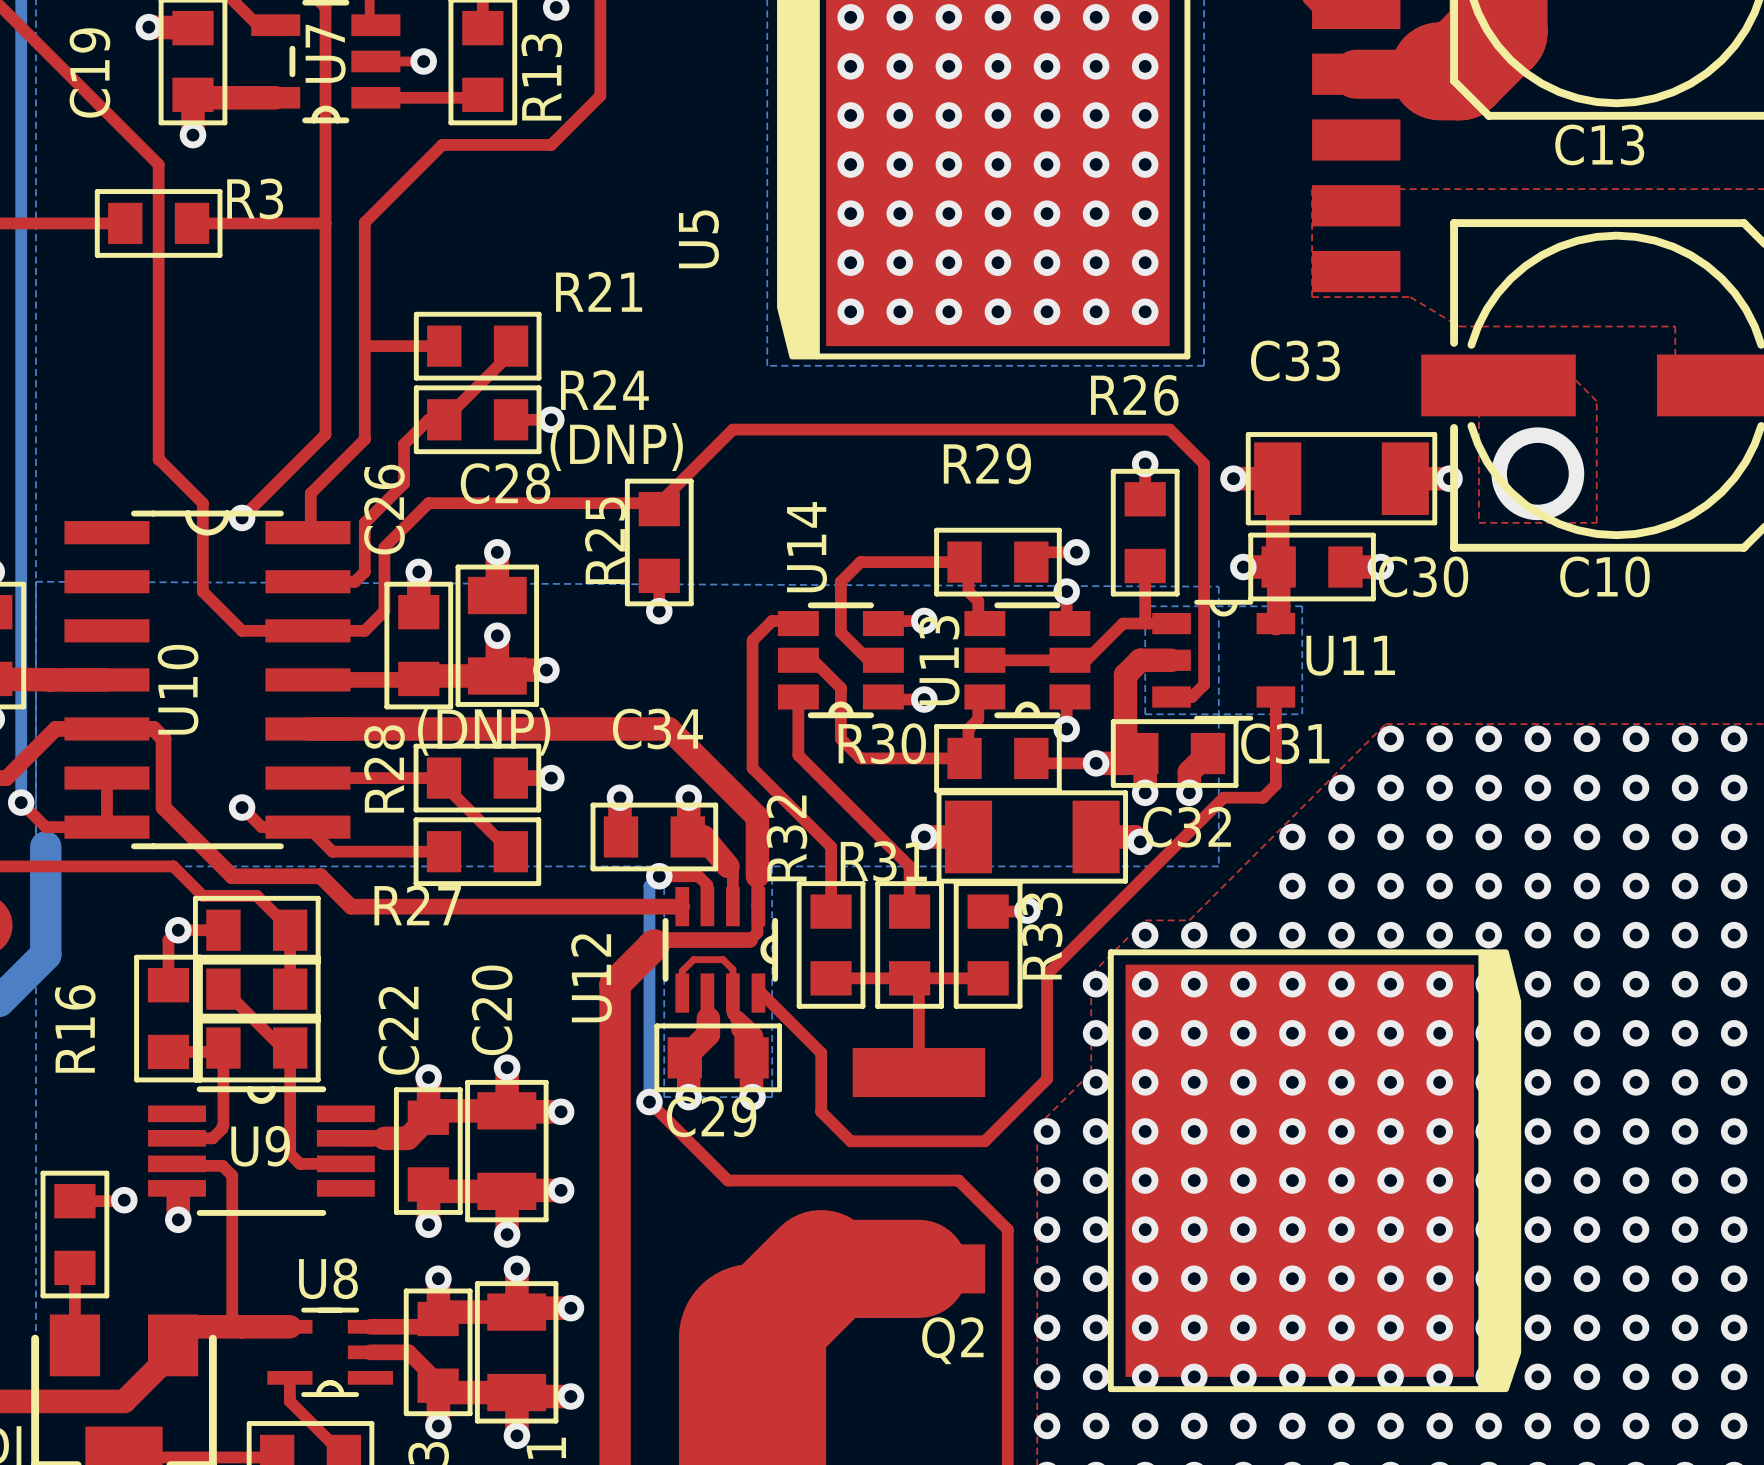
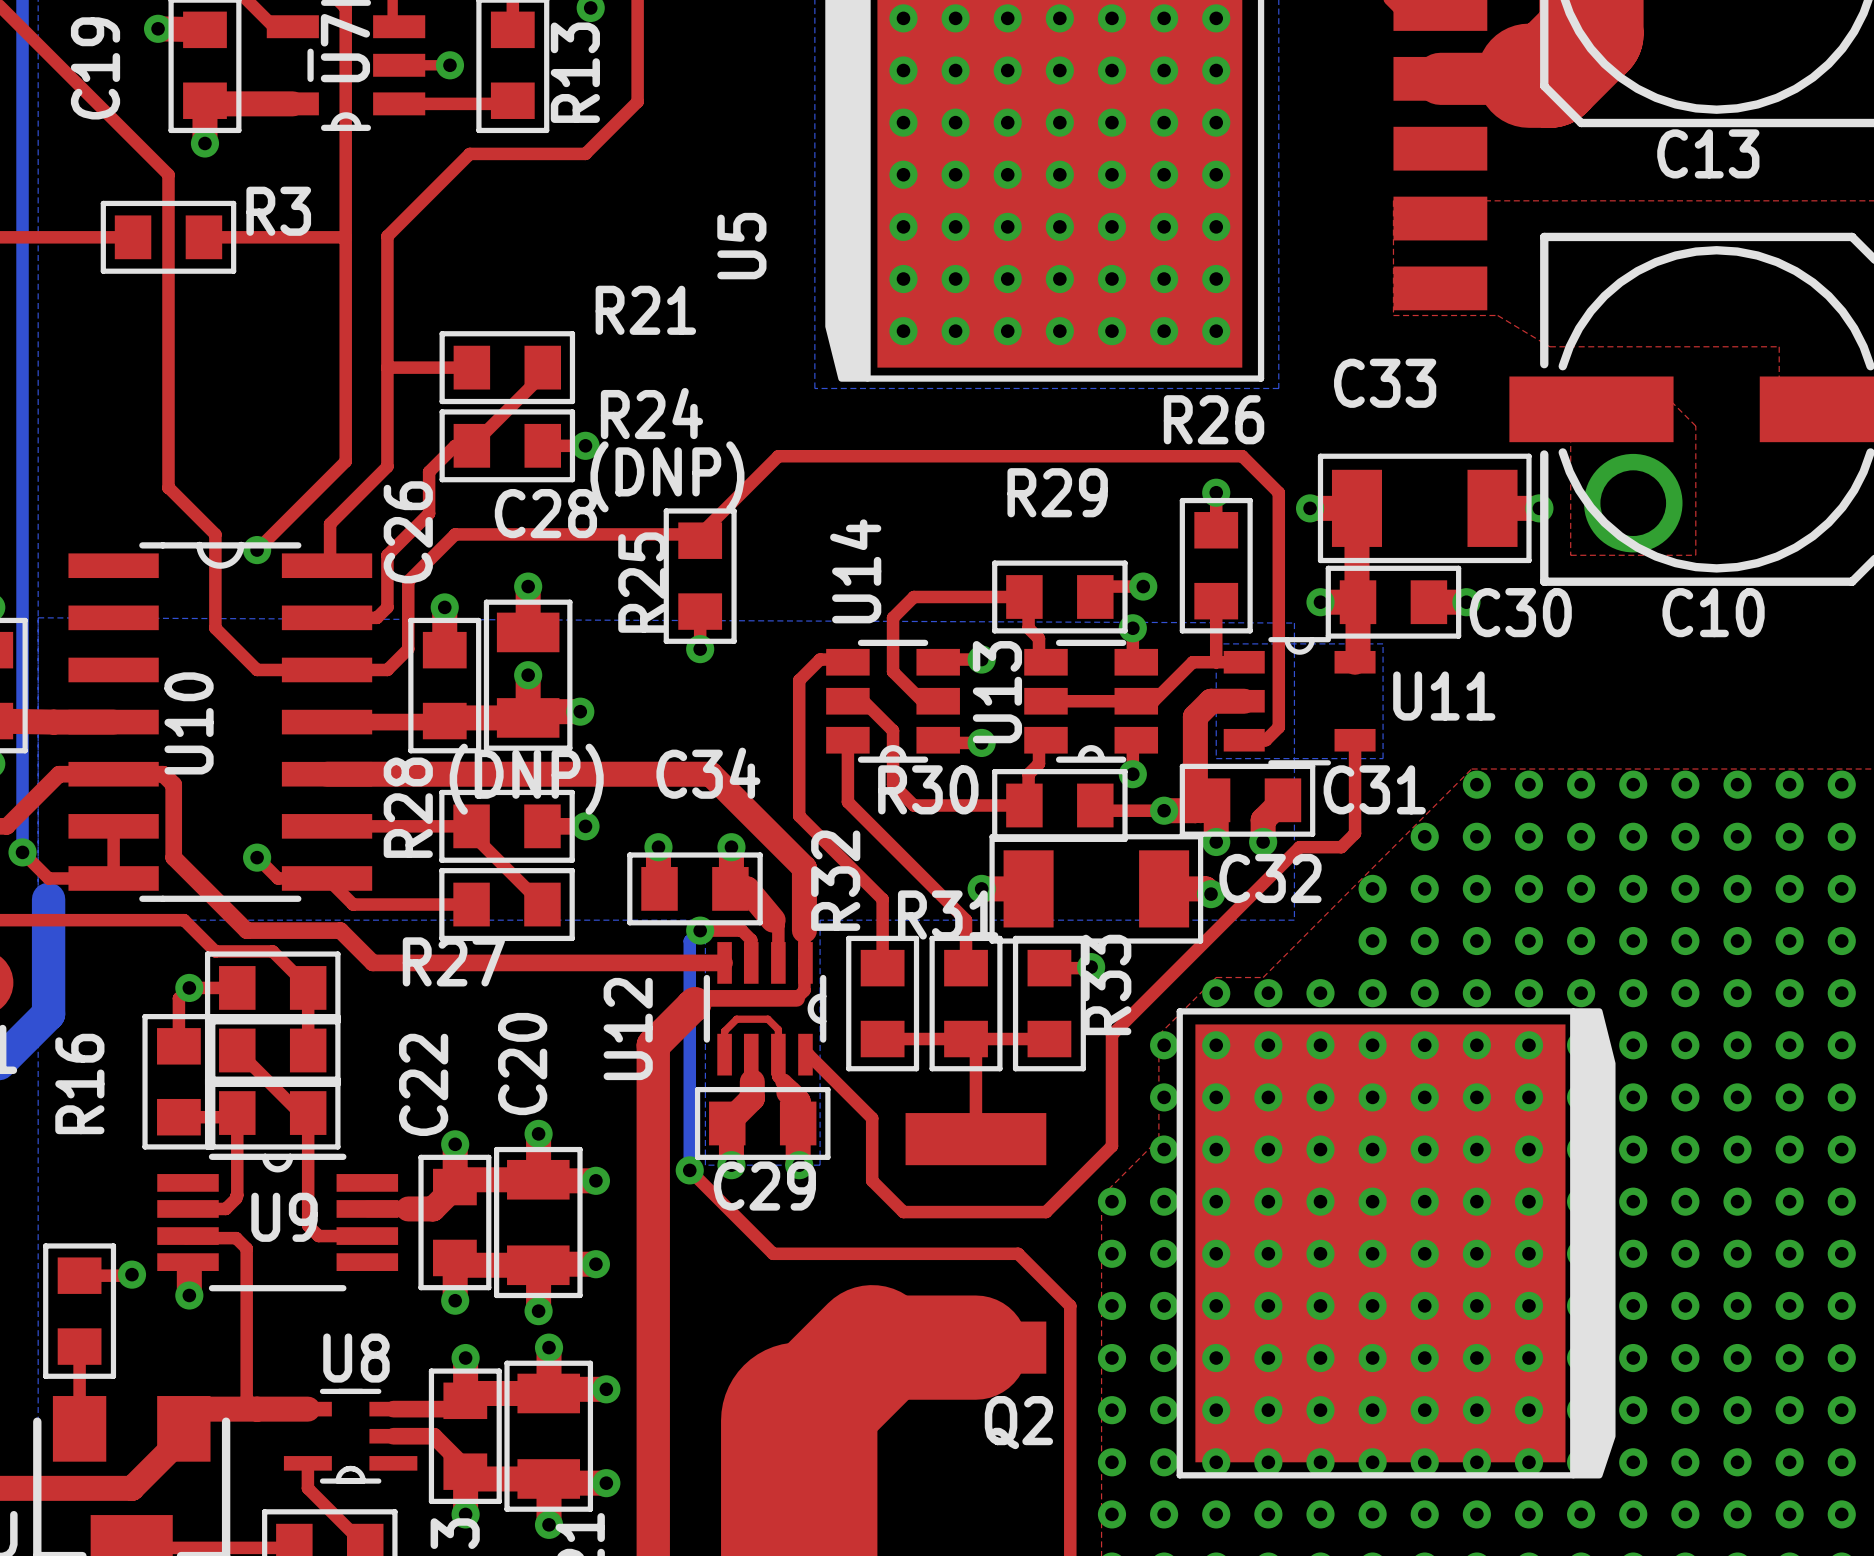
C33 footprint: [1245, 432, 1438, 526] -> [1317, 453, 1532, 564]
C32 footprint: [936, 790, 1129, 884] -> [989, 834, 1204, 944]

